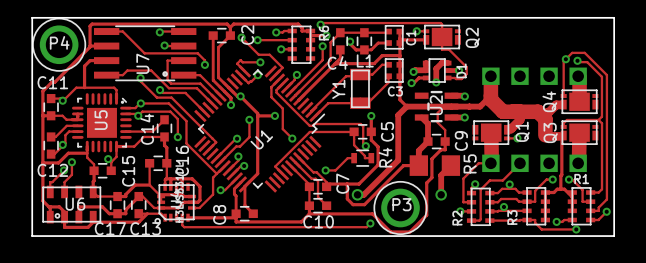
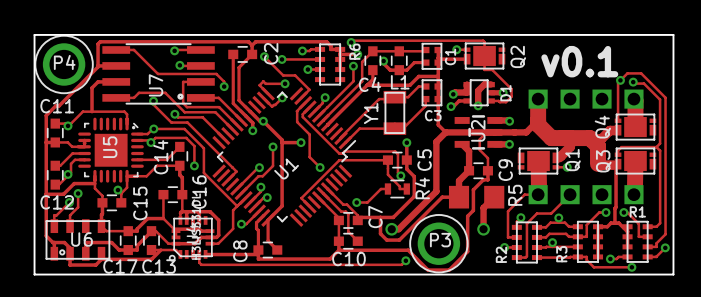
text: none -> v0.1 (579, 61)

